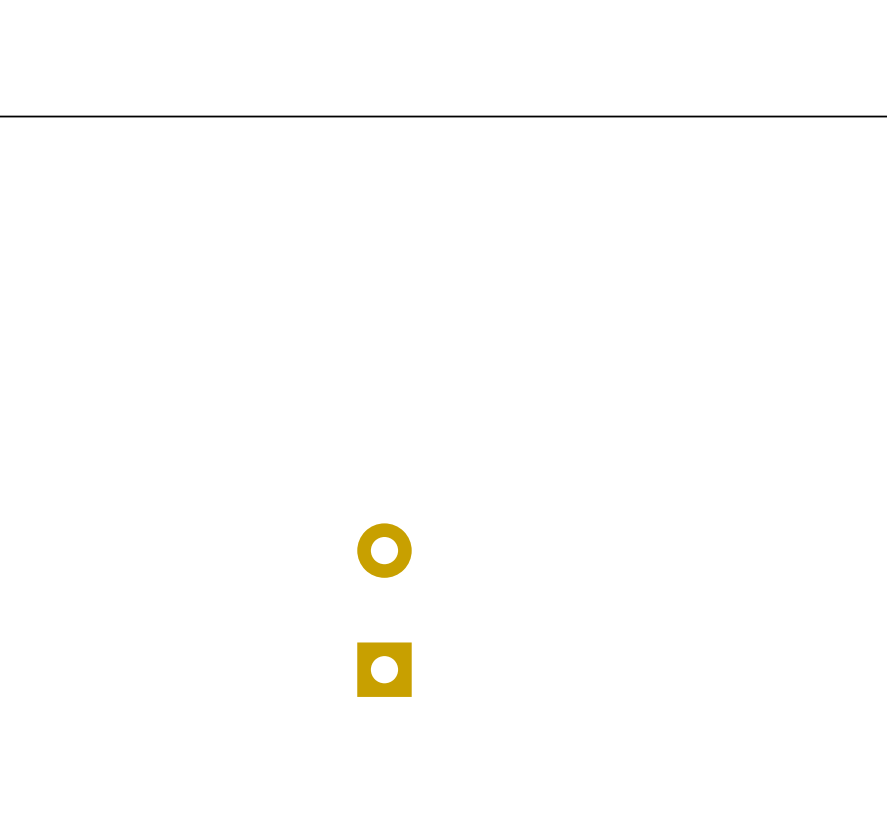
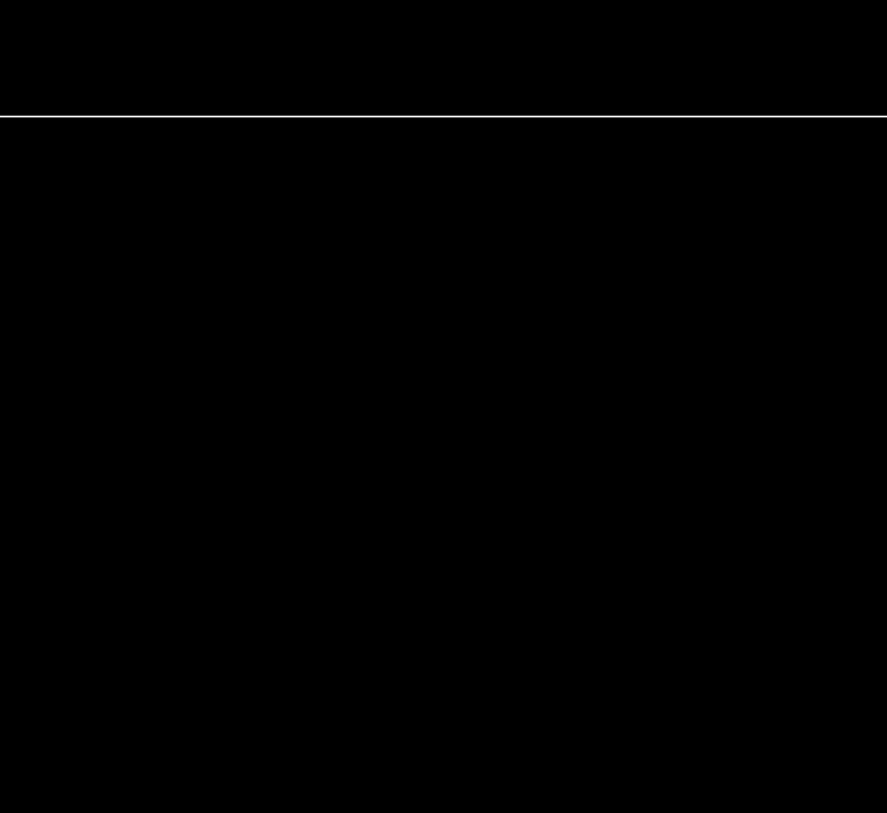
part: (384, 610) -> none

